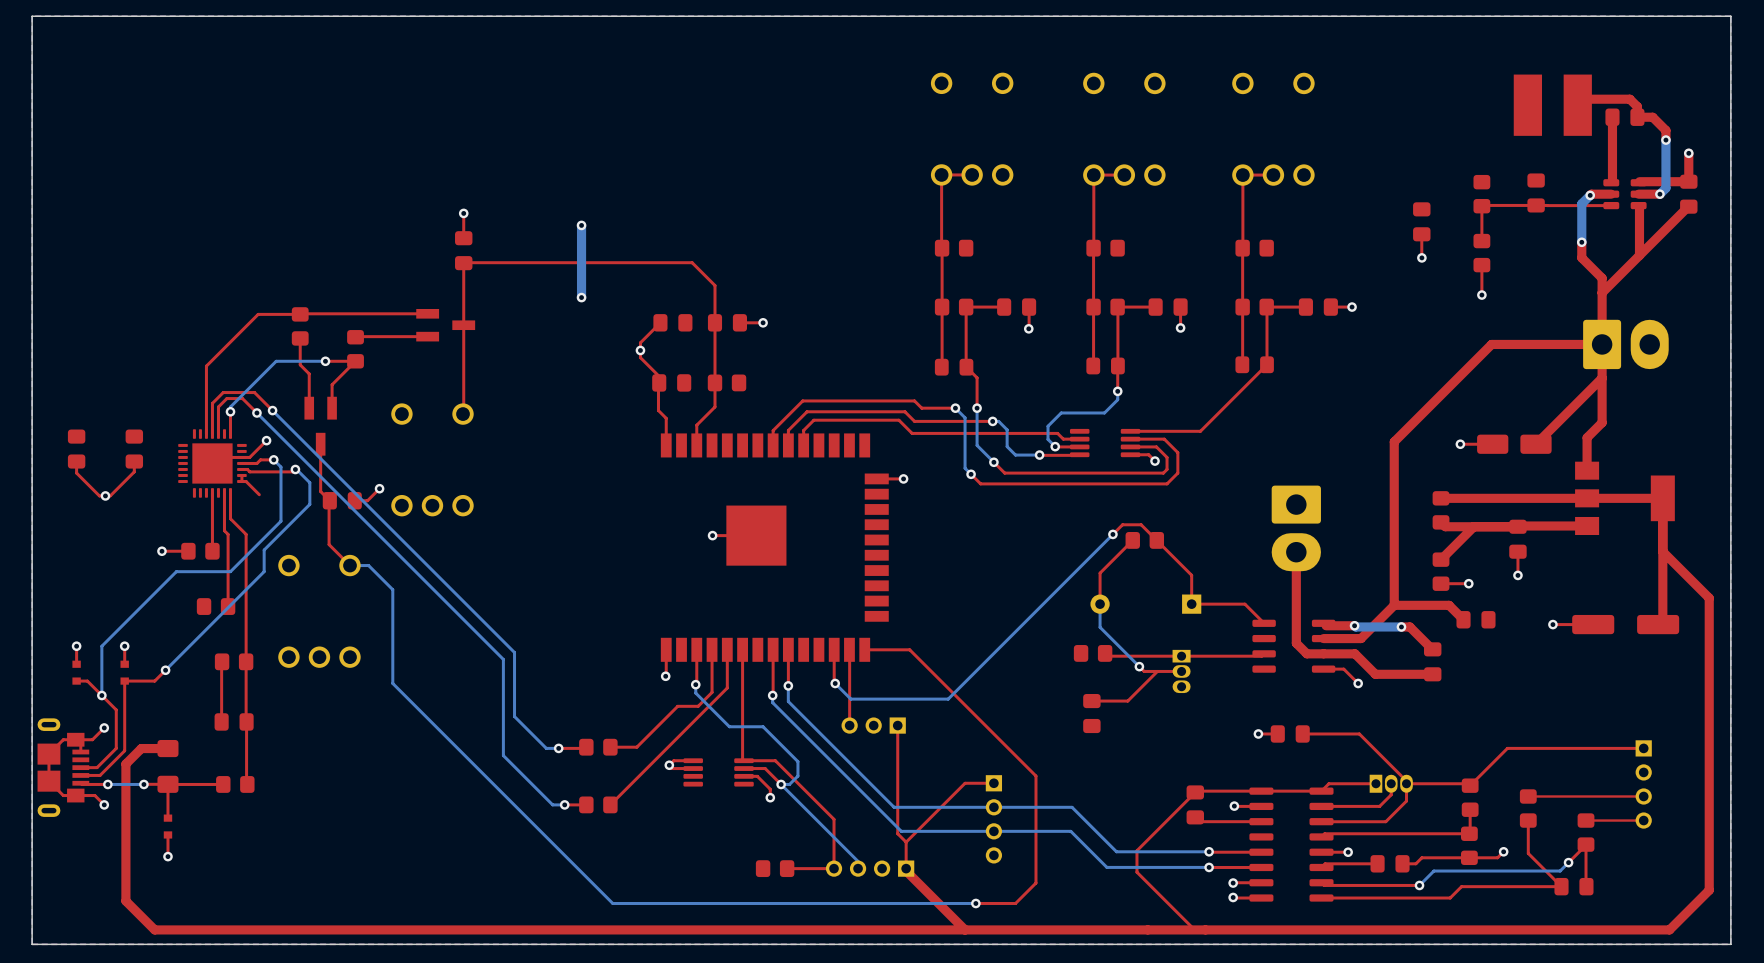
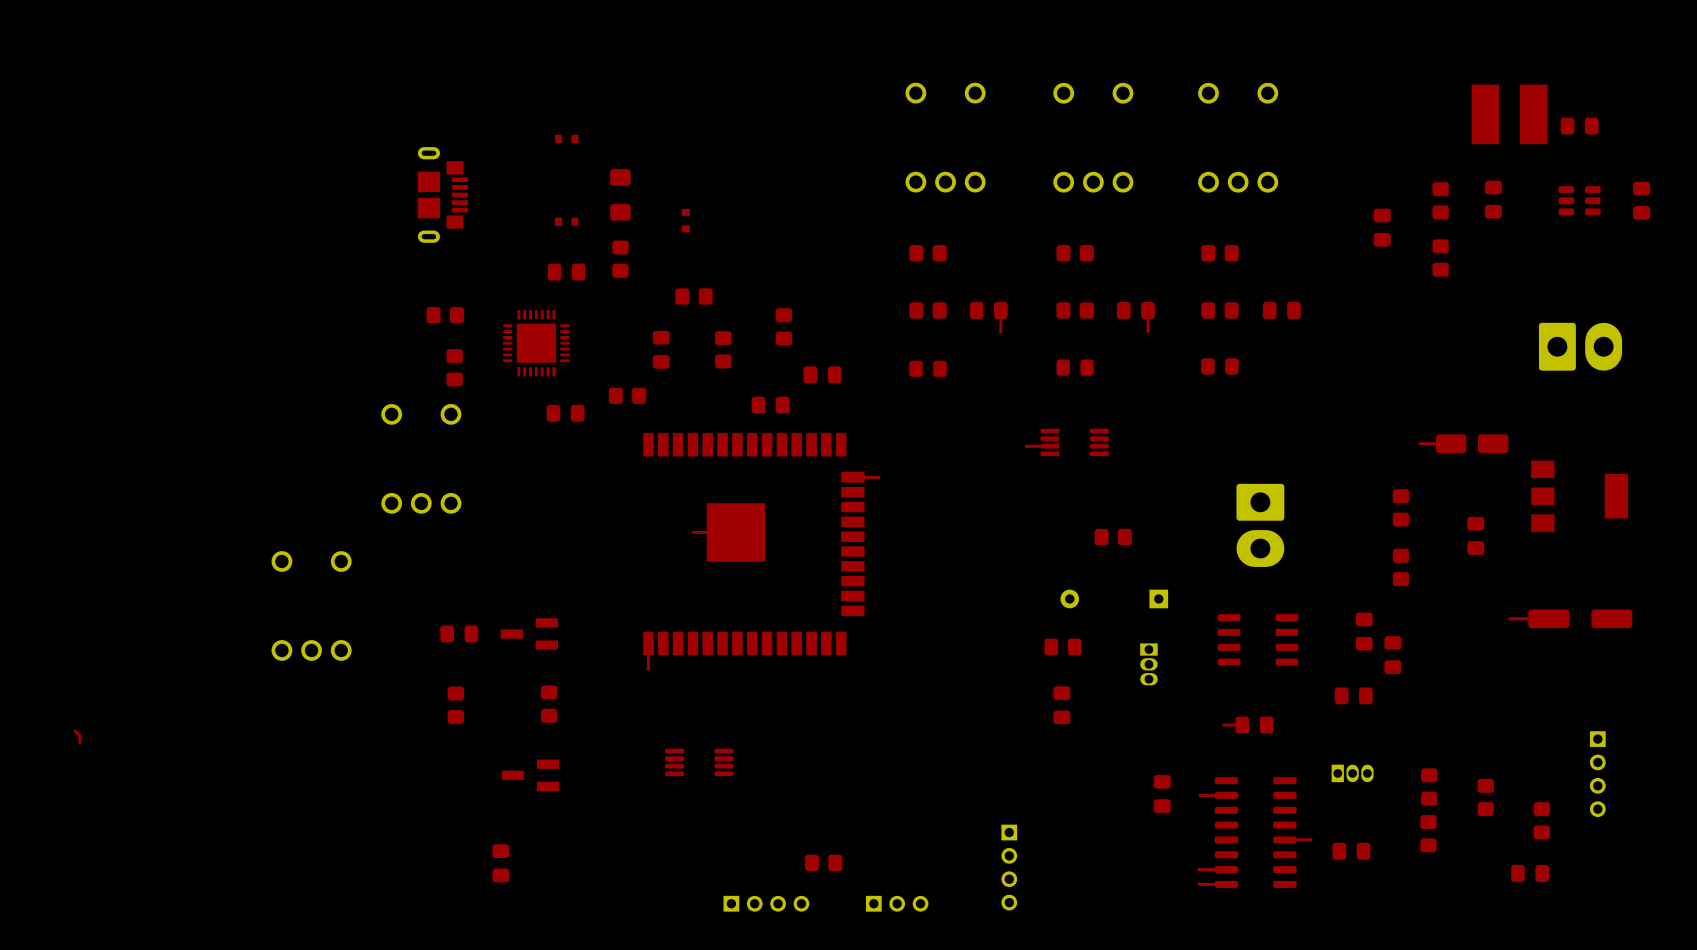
board edge: (1730, 16) (32, 16) (32, 944) (1730, 944) (1730, 16) -> none
top track: (1588, 94) (1577, 105) (1583, 99) (1629, 99) (1637, 106) (1637, 117) -> none
top track: (1612, 117) (1611, 182) -> none
top track: (1637, 117) (1652, 117) (1665, 130) (1665, 140) -> none
part: none -> (566, 138)
bottom track: (1665, 140) (1665, 188) (1659, 194) -> none
via: (1665, 140) -> none
top track: (1688, 153) (1688, 181) (1639, 181) -> none
via: (1688, 153) -> none
top track: (972, 174) (941, 174) (941, 367) -> none
top track: (1124, 175) (1093, 175) (1093, 365) -> none
top track: (1273, 175) (1242, 175) (1242, 364) -> none
part: none -> (442, 194)
part: none -> (620, 194)
top track: (1659, 194) (1638, 194) -> none
via: (1659, 194) -> none
bottom track: (1590, 195) (1581, 203) (1581, 242) -> none
via: (1590, 195) -> none
top track: (1610, 195) (1611, 194) (1590, 195) -> none
top track: (1546, 205) (1482, 205) (1481, 241) -> none
top track: (1611, 205) (1546, 205) -> none
top track: (1639, 206) (1639, 255) -> none
top track: (1688, 206) (1602, 292) -> none
top track: (463, 213) (463, 238) -> none
via: (463, 213) -> none
part: none -> (685, 220)
part: none -> (566, 221)
bottom track: (581, 225) (581, 297) -> none
via: (581, 225) -> none
top track: (1421, 234) (1421, 257) -> none
top track: (1581, 242) (1581, 257) (1602, 278) (1602, 422) (1587, 437) (1587, 470) -> none
via: (1581, 242) -> none
part: (463, 250) -> none
part: none -> (620, 259)
via: (1421, 257) -> none
top track: (1481, 265) (1481, 295) -> none
part: none -> (566, 272)
part: none -> (694, 296)
via: (1481, 295) -> none
via: (581, 297) -> none
top track: (1004, 307) (966, 307) (966, 366) (977, 377) (977, 408) -> none
top track: (1155, 307) (1117, 307) (1117, 391) -> none
top track: (1305, 307) (1266, 307) (1266, 364) (1200, 431) (1130, 431) -> none
top track: (1352, 307) (1330, 307) -> none
via: (1352, 307) -> none
part: none -> (445, 315)
top track: (427, 313) (258, 314) (206, 366) (206, 434) -> none
top track: (660, 322) (640, 342) (640, 357) (659, 376) (658, 410) (666, 418) (666, 445) -> none
part: (672, 322) -> none
part: (727, 322) -> none
top track: (763, 322) (739, 322) -> none
via: (763, 322) -> none
part: none -> (783, 326)
part: (445, 325) -> none
part: (300, 326) -> none
via: (1180, 327) -> none
via: (1028, 328) -> none
top track: (427, 336) (355, 337) -> none
top track: (300, 338) (300, 364) (309, 373) (309, 408) -> none
part: none -> (536, 343)
top track: (1602, 344) (1491, 344) (1394, 441) (1394, 605) -> none
part: none -> (661, 349)
part: (355, 349) -> none
via: (640, 350) -> none
top track: (325, 361) (355, 361) (332, 384) (332, 408) -> none
bottom track: (325, 361) (276, 361) (230, 406) (230, 411) -> none
via: (325, 361) -> none
part: none -> (454, 367)
part: none -> (822, 374)
top track: (1602, 378) (1535, 444) -> none
part: (671, 382) -> none
part rotation: 0° (727, 382) -> 90° clockwise (723, 349)
part position: (727, 382) -> (723, 349)
bottom track: (1117, 391) (1117, 399) (1104, 412) (1061, 412) (1048, 426) (1048, 439) (1055, 446) -> none
via: (1117, 391) -> none
part: none -> (627, 395)
part: none -> (770, 405)
top track: (955, 408) (921, 408) (914, 400) (802, 400) (773, 430) (773, 445) -> none
bottom track: (955, 408) (965, 417) (965, 468) (971, 474) -> none
via: (955, 408) -> none
bottom track: (977, 408) (977, 445) (993, 462) -> none
via: (977, 408) -> none
top track: (272, 410) (254, 392) (223, 392) (212, 403) (212, 434) -> none
bottom track: (272, 410) (514, 652) (514, 716) (546, 748) (558, 748) -> none
via: (272, 410) -> none
top track: (230, 411) (230, 434) -> none
via: (230, 411) -> none
top track: (256, 412) (242, 398) (226, 398) (218, 406) (218, 434) -> none
bottom track: (256, 412) (503, 659) (503, 755) (552, 804) (564, 804) -> none
via: (256, 412) -> none
part: none -> (565, 413)
top track: (463, 414) (464, 262) (692, 262) (714, 285) (714, 406) (696, 425) (696, 445) -> none
top track: (992, 421) (914, 421) (904, 411) (807, 411) (788, 430) (788, 445) -> none
bottom track: (992, 421) (998, 421) (1007, 429) (1007, 446) (1015, 455) (1039, 455) -> none
via: (992, 421) -> none
part: (320, 426) -> none
top track: (1079, 439) (1063, 439) (1057, 433) (912, 433) (898, 420) (813, 420) (803, 430) (803, 445) -> none
top track: (1130, 439) (1164, 439) (1177, 452) (1177, 473) (1167, 483) (980, 483) (971, 474) -> none
top track: (266, 440) (249, 457) (218, 457) (212, 463) -> none
via: (266, 440) -> none
top track: (320, 444) (320, 491) (329, 500) (329, 544) (350, 565) -> none
via: (1460, 444) -> none
via: (1055, 446) -> none
top track: (1130, 446) (1156, 446) (1167, 457) (1167, 469) (1163, 473) (1004, 473) (993, 462) -> none
part: (76, 449) -> none
part: (134, 449) -> none
top track: (1079, 454) (1039, 455) -> none
top track: (1130, 454) (1148, 454) (1155, 461) -> none
via: (1039, 455) -> none
top track: (273, 459) (260, 459) (256, 463) (241, 463) -> none
bottom track: (273, 459) (280, 467) (280, 521) (230, 571) (176, 571) (101, 646) (101, 695) -> none
via: (273, 459) -> none
top track: (134, 461) (134, 471) (110, 495) (99, 495) (76, 473) (76, 461) -> none
via: (1155, 461) -> none
via: (993, 462) -> none
part: (212, 463) -> none
top track: (295, 469) (293, 471) (249, 471) (247, 469) (241, 469) -> none
bottom track: (295, 469) (309, 482) (309, 504) (264, 550) (264, 571) (165, 670) -> none
via: (295, 469) -> none
via: (971, 474) -> none
top track: (241, 475) (241, 481) (246, 481) (259, 494) -> none
via: (903, 478) -> none
top track: (379, 488) (367, 500) (354, 500) -> none
via: (379, 488) -> none
top track: (212, 492) (212, 551) -> none
top track: (224, 492) (224, 530) (228, 534) (228, 606) -> none
top track: (230, 492) (230, 518) (246, 534) (247, 784) -> none
via: (105, 495) -> none
top track: (1441, 498) (1662, 498) (1662, 619) (1658, 624) -> none
part: (342, 500) -> none
top track: (1441, 522) (1445, 526) (1587, 525) -> none
top track: (1473, 526) (1441, 559) -> none
top track: (1112, 534) (1122, 524) (1141, 524) (1191, 575) (1191, 604) (1244, 604) (1264, 623) -> none
bottom track: (1112, 534) (948, 699) (850, 699) (835, 683) -> none
via: (1112, 534) -> none
via: (712, 535) -> none
top track: (1132, 540) (1100, 573) (1100, 604) -> none
via: (161, 551) -> none
top track: (188, 551) (161, 551) -> none
part: (200, 551) -> none
top track: (1517, 551) (1517, 575) -> none
top track: (1662, 551) (1709, 598) (1709, 890) (1669, 929) (154, 929) (125, 901) (125, 764) (141, 748) (167, 748) -> none
top track: (1296, 552) (1296, 643) (1306, 653) (1355, 653) (1375, 674) (1432, 674) -> none
bottom track: (350, 565) (368, 565) (392, 589) (392, 683) (612, 903) (975, 903) -> none
via: (1517, 575) -> none
top track: (1468, 583) (1441, 583) -> none
via: (1468, 583) -> none
bottom track: (1100, 604) (1100, 627) (1139, 666) -> none
top track: (1394, 605) (1449, 605) (1463, 619) -> none
top track: (1394, 605) (1361, 638) (1323, 638) -> none
part: (216, 606) -> none
part: (1476, 619) -> none
via: (1552, 624) -> none
top track: (1354, 625) (1326, 625) -> none
bottom track: (1354, 625) (1401, 626) -> none
via: (1354, 625) -> none
top track: (1401, 626) (1409, 626) (1432, 649) -> none
via: (1401, 626) -> none
part: none -> (1364, 631)
part: none -> (459, 634)
part: none -> (529, 634)
top track: (76, 646) (76, 664) -> none
via: (76, 646) -> none
top track: (124, 646) (124, 664) -> none
via: (124, 646) -> none
top track: (696, 649) (695, 684) -> none
top track: (712, 649) (712, 692) (698, 706) (677, 706) (636, 747) (610, 747) -> none
top track: (727, 649) (727, 687) (610, 804) -> none
top track: (742, 649) (742, 759) (775, 760) (834, 819) (834, 868) (787, 868) -> none
top track: (773, 649) (772, 695) -> none
top track: (788, 649) (788, 685) -> none
top track: (834, 649) (835, 683) -> none
top track: (849, 649) (849, 725) -> none
top track: (864, 649) (909, 649) (1035, 776) (1035, 883) (1015, 903) (975, 903) -> none
top track: (1105, 653) (1107, 656) (1261, 656) (1264, 653) -> none
top track: (222, 661) (221, 721) -> none
part: (234, 661) -> none
top track: (1139, 666) (1144, 671) (1181, 671) -> none
via: (1139, 666) -> none
top track: (1323, 669) (1343, 669) (1358, 683) -> none
top track: (165, 670) (154, 681) (124, 681) (124, 750) (100, 775) (80, 775) -> none
via: (165, 670) -> none
top track: (1157, 671) (1127, 701) (1091, 701) -> none
part: (76, 672) -> none
part: (124, 672) -> none
via: (665, 676) -> none
top track: (76, 681) (87, 681) (116, 709) (116, 748) (97, 767) (80, 767) -> none
via: (835, 683) -> none
via: (1358, 683) -> none
bottom track: (695, 684) (695, 693) (729, 726) (763, 726) (797, 761) (797, 776) (789, 784) (781, 784) (858, 861) (858, 868) -> none
via: (695, 684) -> none
bottom track: (788, 685) (788, 701) (894, 807) (1072, 807) (1116, 851) (1209, 851) -> none
via: (788, 685) -> none
via: (101, 695) -> none
bottom track: (772, 695) (772, 702) (901, 831) (1070, 831) (1106, 867) (1209, 867) -> none
via: (772, 695) -> none
part: none -> (1353, 695)
part: none -> (455, 705)
part: (234, 721) -> none
part rotation: 0° (873, 725) -> 180° (897, 903)
part position: (873, 725) -> (897, 903)
top track: (897, 725) (897, 833) (906, 842) -> none
top track: (104, 727) (92, 739) (63, 739) (48, 754) (48, 781) (63, 795) (94, 795) (104, 804) -> none
via: (104, 727) -> none
via: (1258, 733) -> none
top track: (1302, 733) (1359, 733) (1401, 776) -> none
top track: (586, 747) (558, 748) -> none
part rotation: 0° (598, 747) -> 90° clockwise (549, 704)
part position: (598, 747) -> (549, 704)
via: (558, 748) -> none
top track: (1643, 748) (1507, 748) (1470, 785) (1468, 783) (1406, 783) (1406, 801) (1385, 821) (1321, 821) -> none
top track: (693, 760) (673, 760) (669, 765) (672, 768) (693, 768) -> none
via: (669, 765) -> none
part: (167, 766) -> none
part: (63, 767) -> none
top track: (744, 768) (765, 768) (781, 784) -> none
top track: (744, 776) (757, 776) (770, 789) (770, 797) -> none
top track: (80, 783) (107, 784) -> none
top track: (166, 783) (223, 784) -> none
top track: (993, 783) (965, 783) (906, 842) -> none
top track: (1375, 783) (1328, 783) (1321, 791) (1196, 791) (1136, 850) (1136, 872) (1194, 929) (1205, 929) -> none
top track: (1391, 783) (1391, 794) (1379, 806) (1321, 806) -> none
via: (107, 784) -> none
bottom track: (143, 784) (107, 784) -> none
via: (143, 784) -> none
top track: (144, 784) (167, 784) (167, 818) -> none
part: (235, 784) -> none
via: (781, 784) -> none
part: none -> (530, 775)
top track: (1643, 796) (1528, 796) -> none
via: (770, 797) -> none
via: (104, 804) -> none
via: (564, 804) -> none
top track: (586, 804) (564, 804) -> none
part: (598, 804) -> none
via: (1234, 806) -> none
top track: (1470, 809) (1469, 833) (1324, 833) (1321, 836) -> none
top track: (1195, 817) (1199, 821) (1261, 821) -> none
part position: (993, 819) -> (1009, 867)
top track: (1528, 820) (1528, 853) (1561, 886) (1461, 886) (1450, 898) (1321, 898) -> none
top track: (1643, 820) (1586, 820) -> none
part: (167, 826) -> none
top track: (167, 834) (167, 856) -> none
top track: (906, 842) (906, 871) (965, 929) -> none
top track: (1586, 844) (1586, 886) -> none
top track: (1586, 845) (1568, 862) -> none
top track: (1209, 851) (1261, 852) -> none
via: (1209, 851) -> none
top track: (1503, 851) (1497, 857) (1421, 857) (1415, 863) (1402, 863) -> none
via: (1503, 851) -> none
via: (1348, 852) -> none
via: (167, 856) -> none
bottom track: (1568, 862) (1560, 871) (1433, 871) (1419, 885) -> none
via: (1568, 862) -> none
top track: (1377, 863) (1325, 863) (1321, 867) -> none
via: (1209, 867) -> none
top track: (1261, 867) (1209, 867) -> none
part position: (775, 868) -> (823, 862)
part: (870, 868) -> none
part: none -> (500, 863)
top track: (1321, 882) (1324, 885) (1419, 885) -> none
via: (1233, 883) -> none
via: (1419, 885) -> none
via: (1233, 897) -> none
via: (975, 903) -> none
part: none -> (766, 903)

